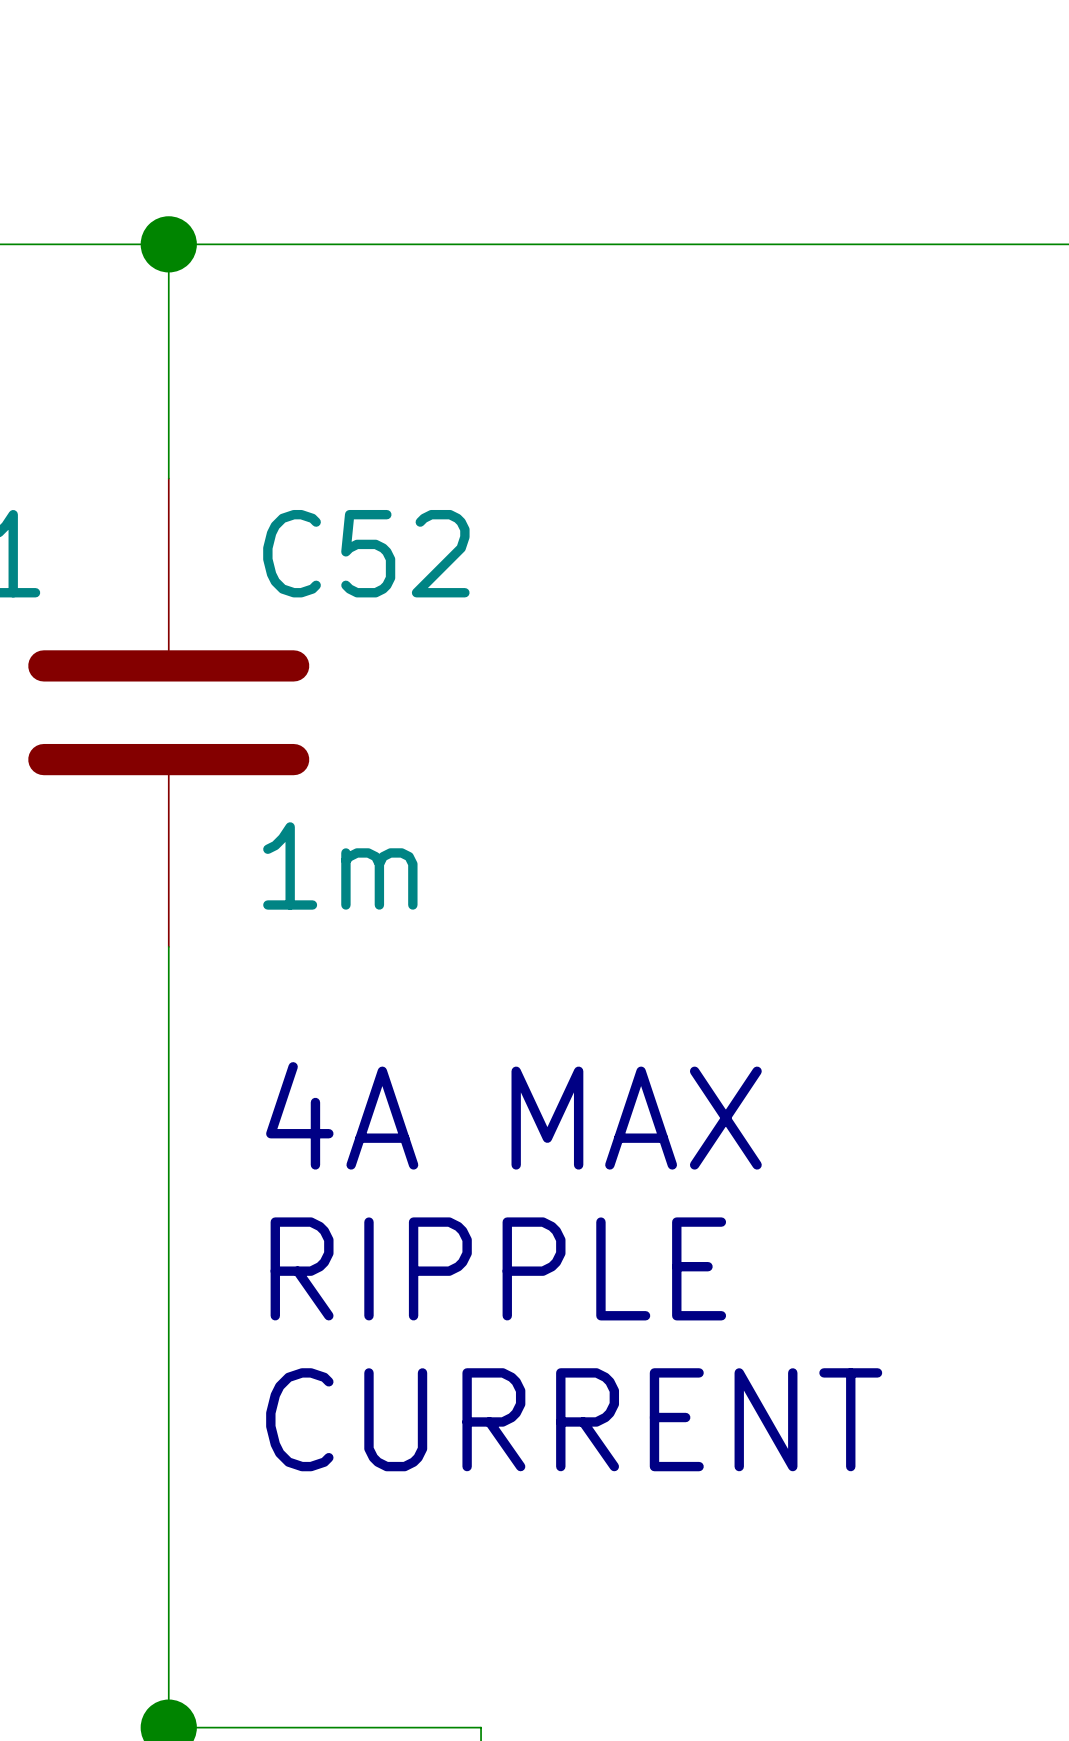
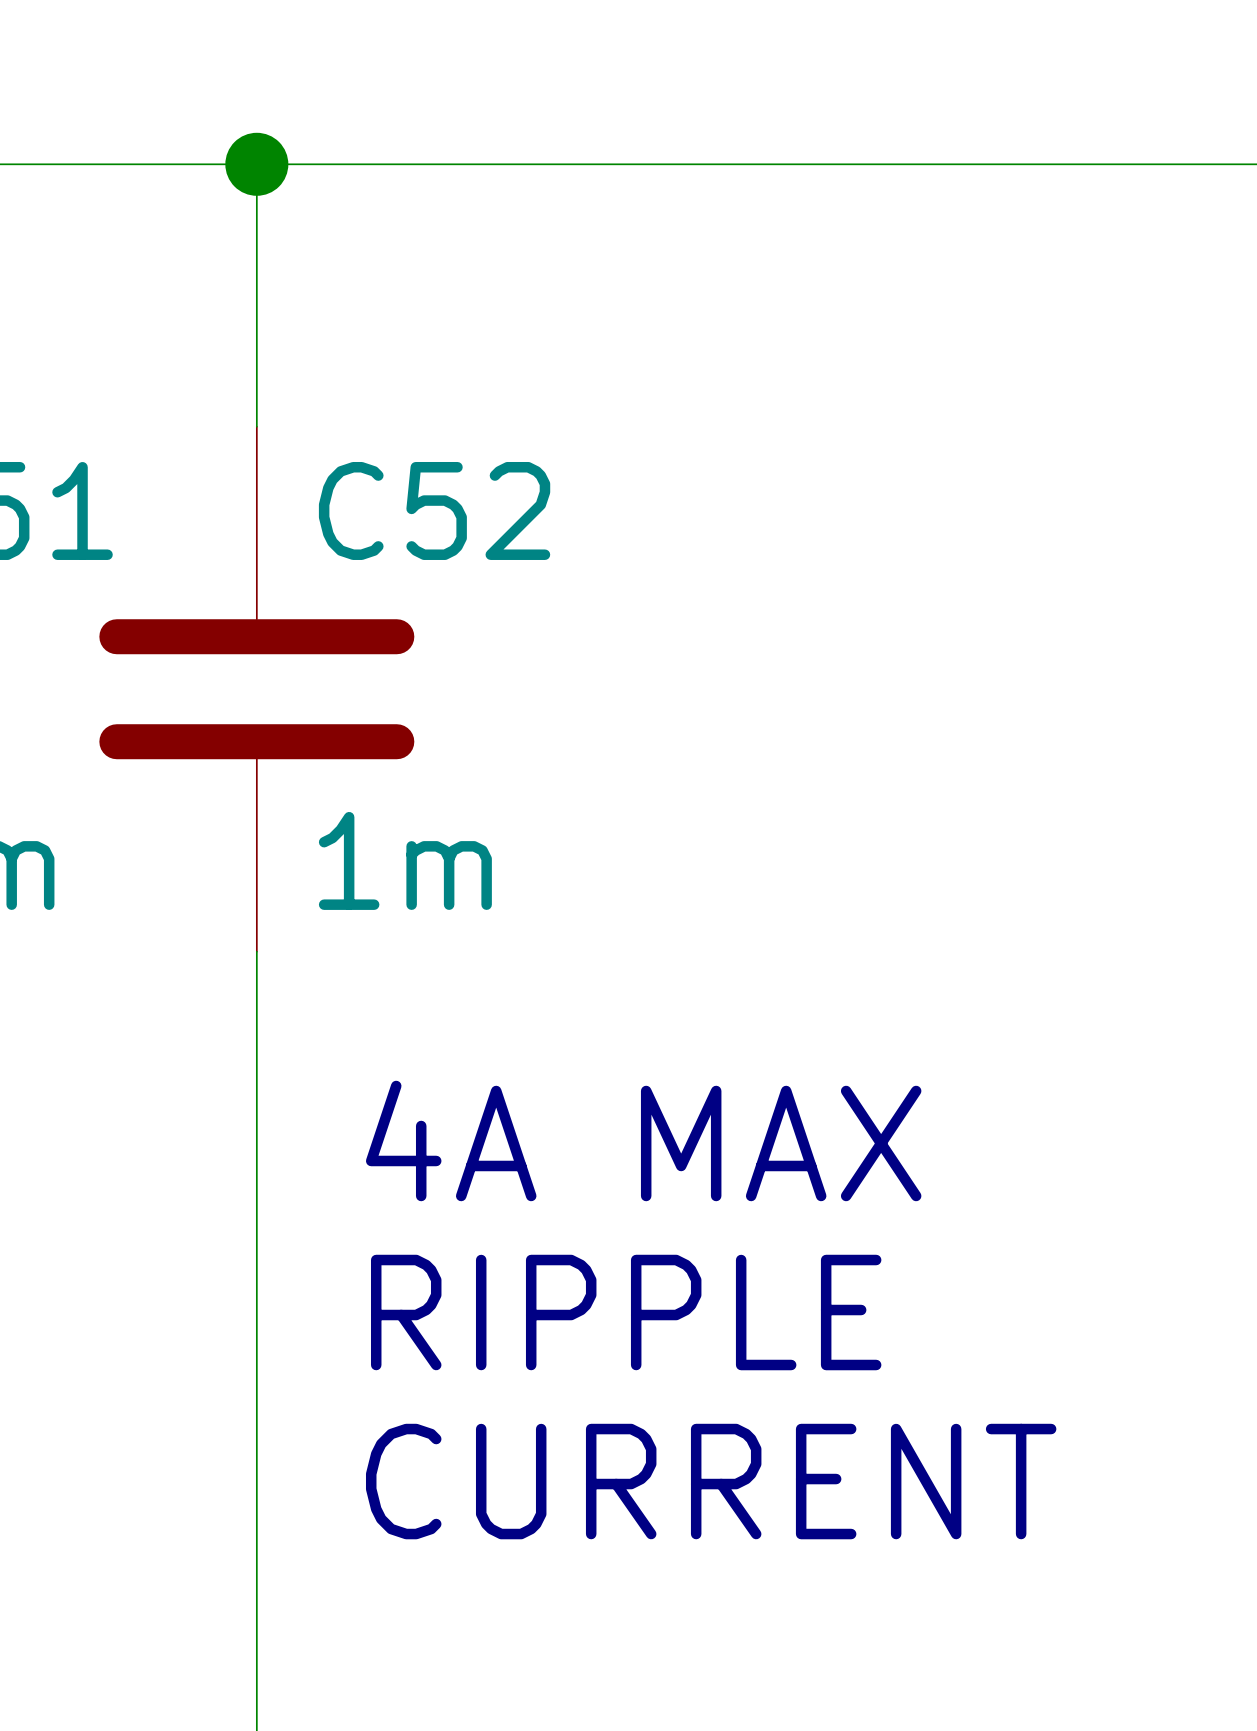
C52 name position: C52 (366, 553) -> C52 (434, 510)
C52 value position: 1m (340, 865) -> 1m (405, 860)

